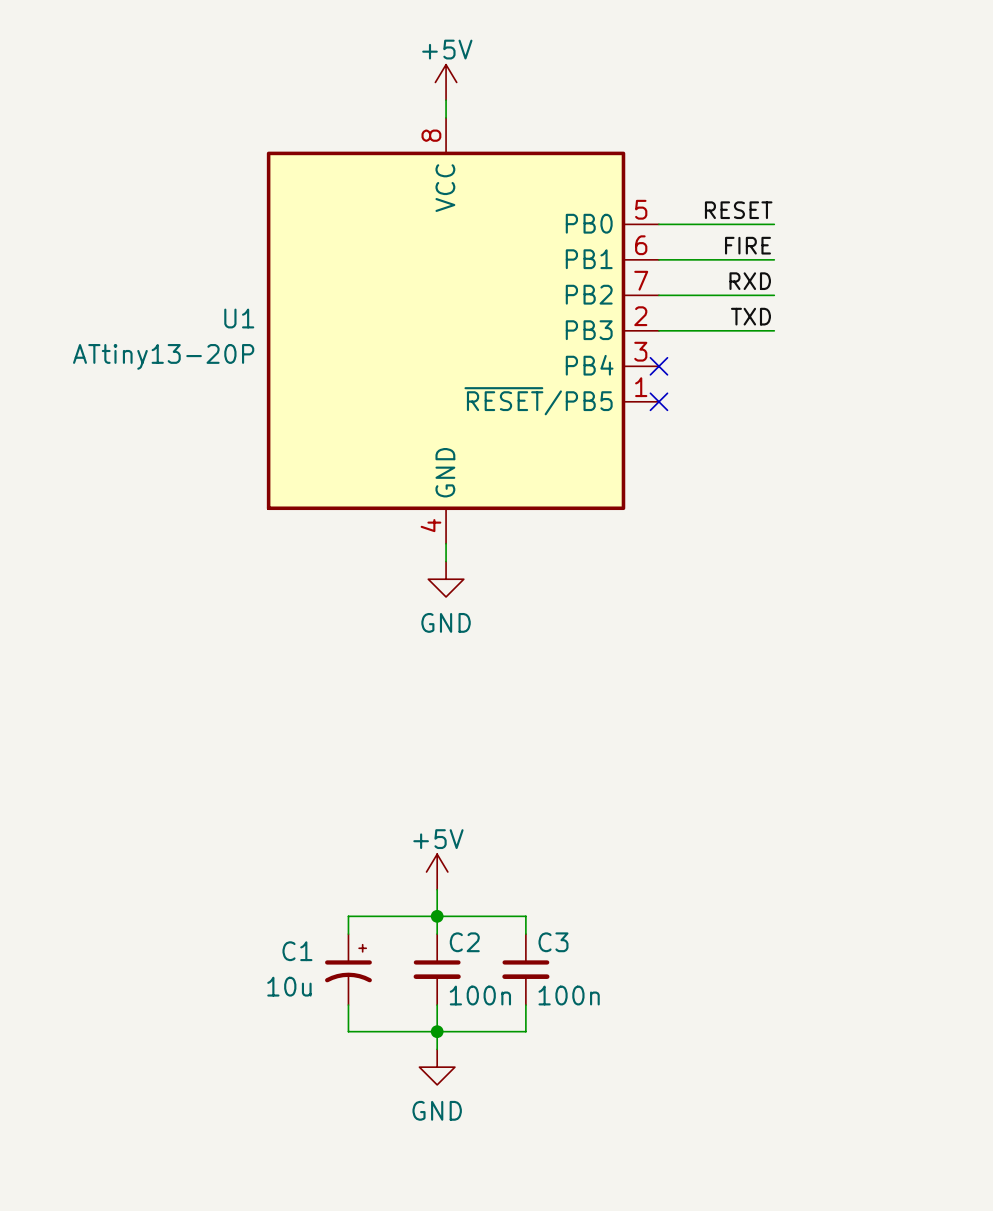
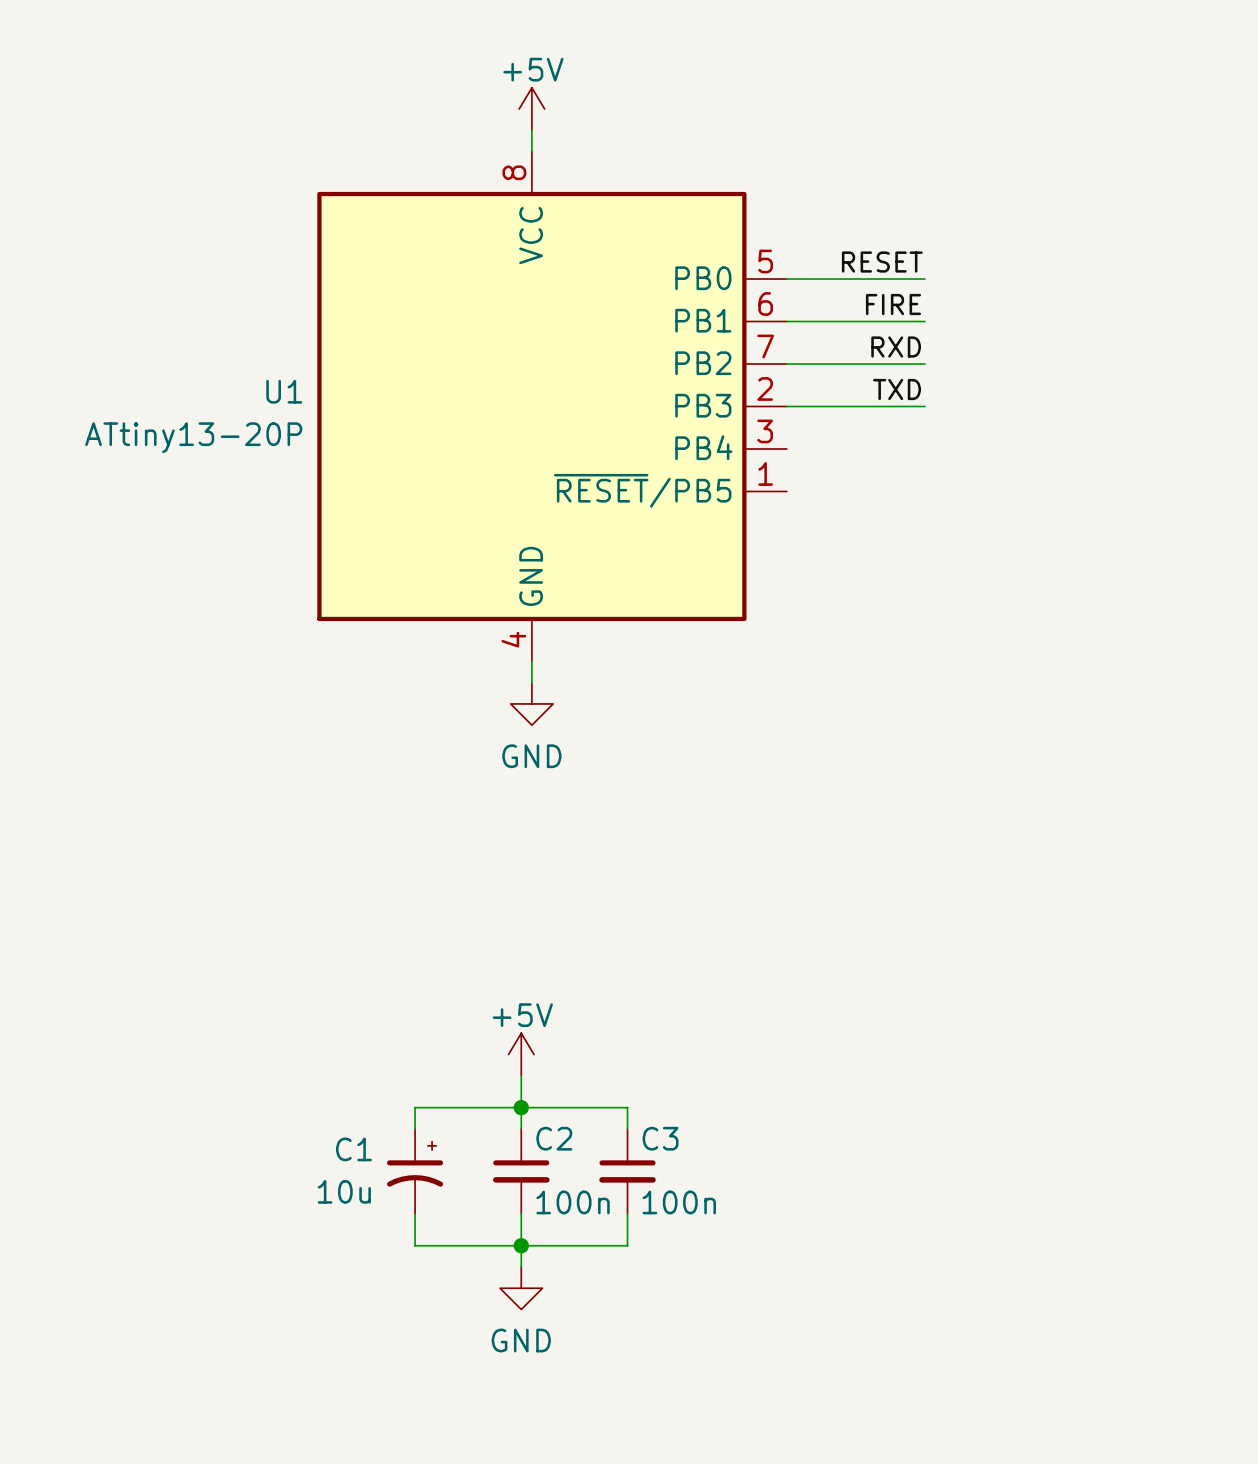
no-connect mark: (658, 366) -> none
no-connect mark: (658, 401) -> none

